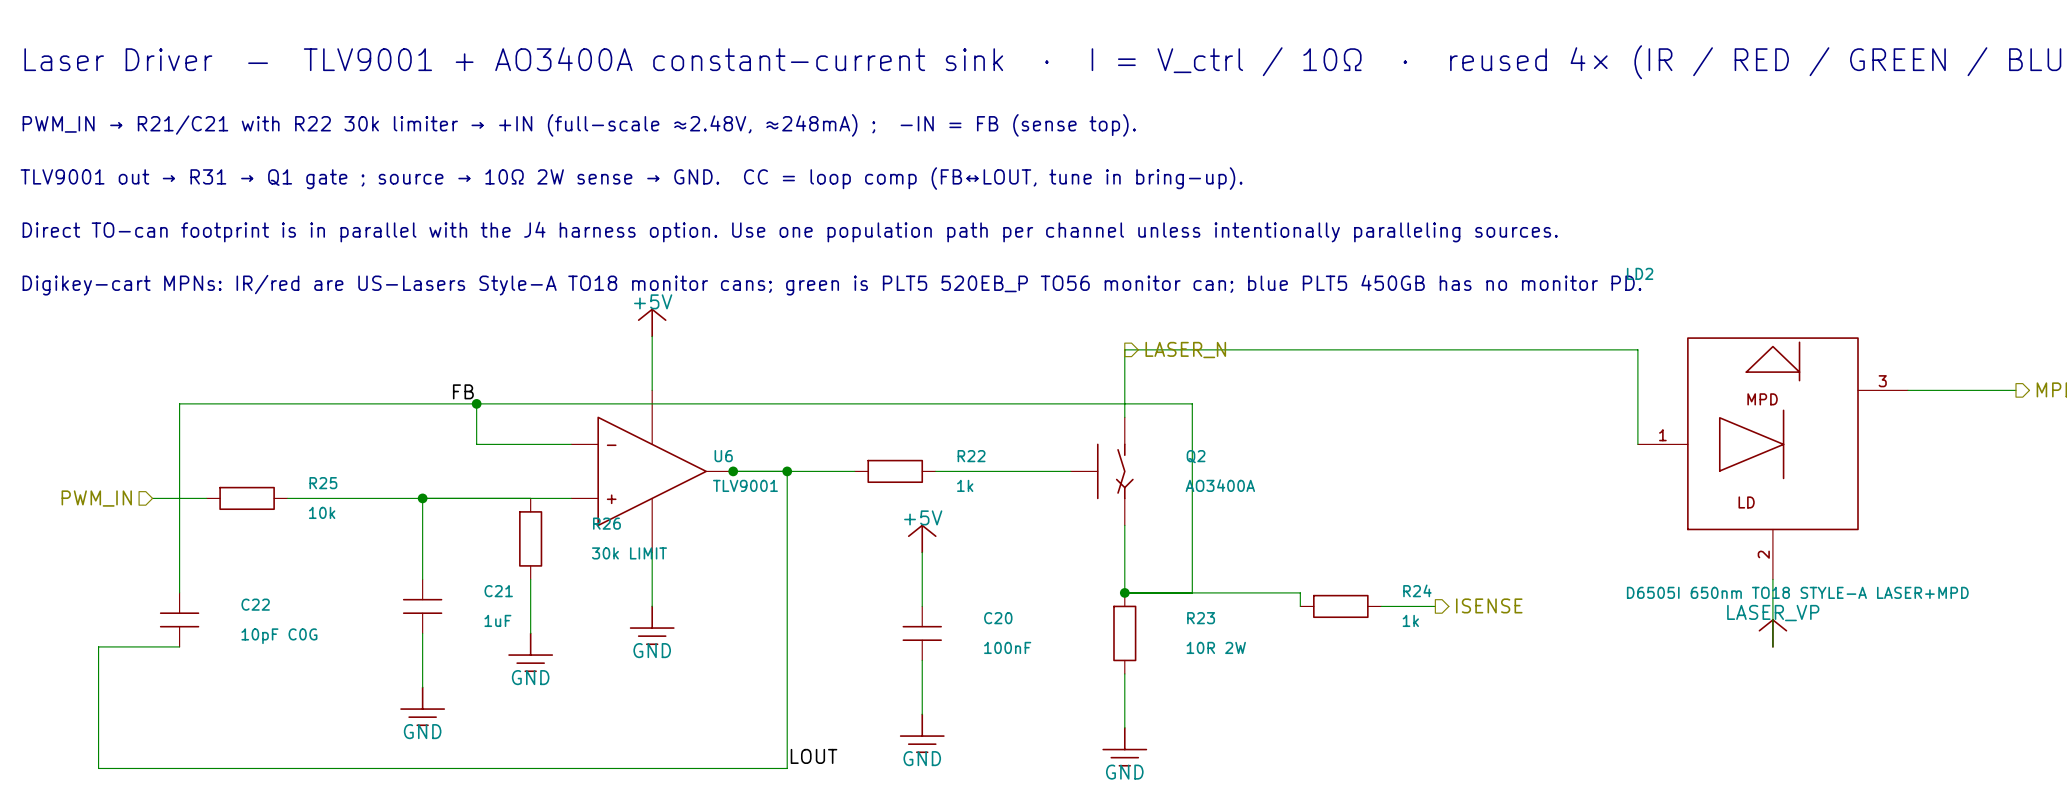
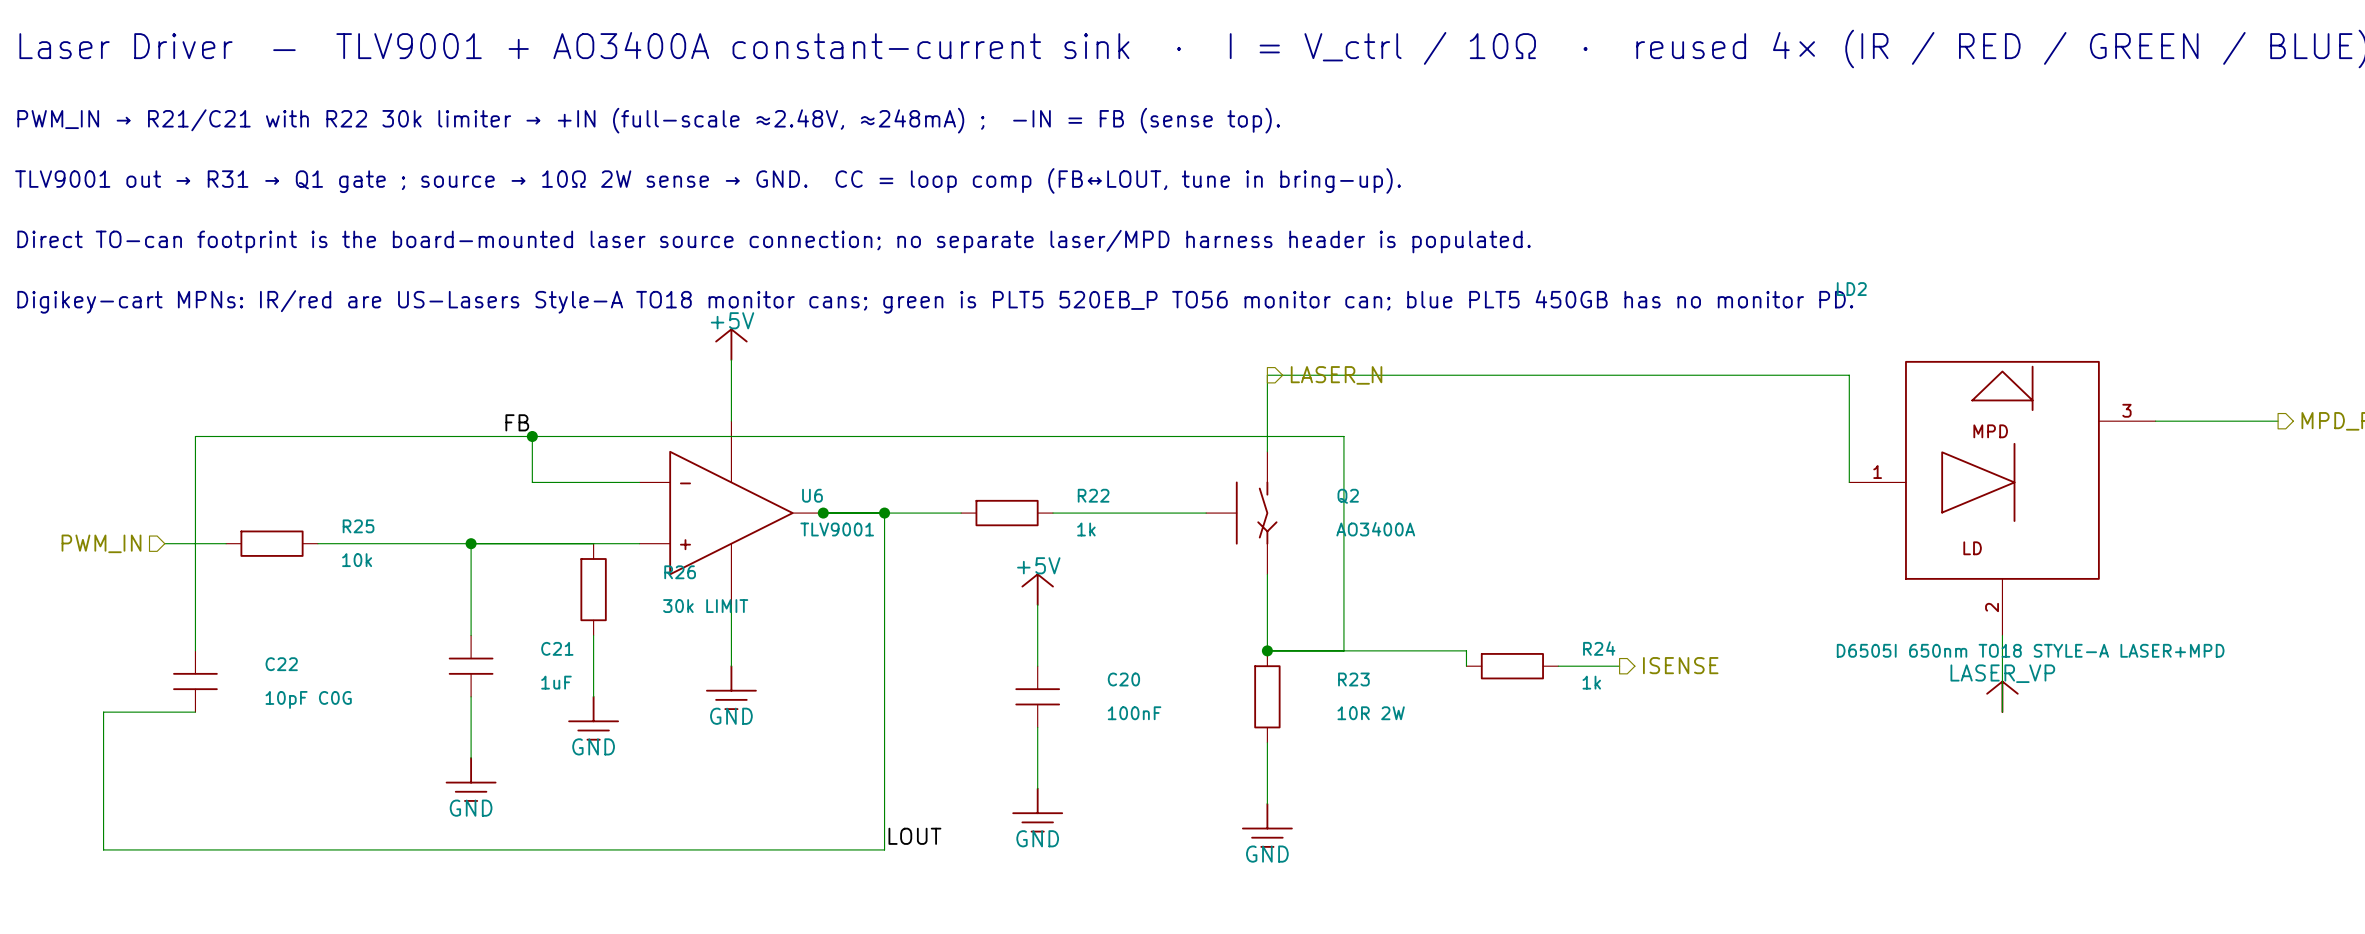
text: Direct TO-can footprint is in parallel with the J4 harness option. Use one population path per channel unless intentionally paralleling sources. (790, 232) -> Direct TO-can footprint is the board-mounted laser source connection; no separate laser/MPD harness header is populated. (774, 241)

